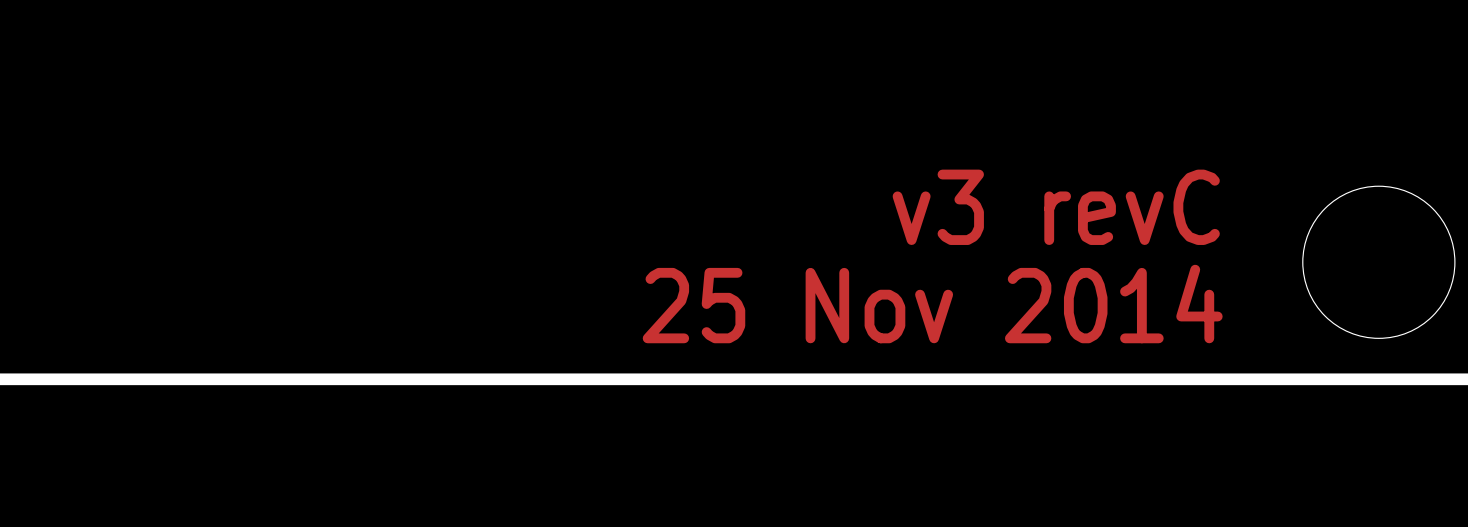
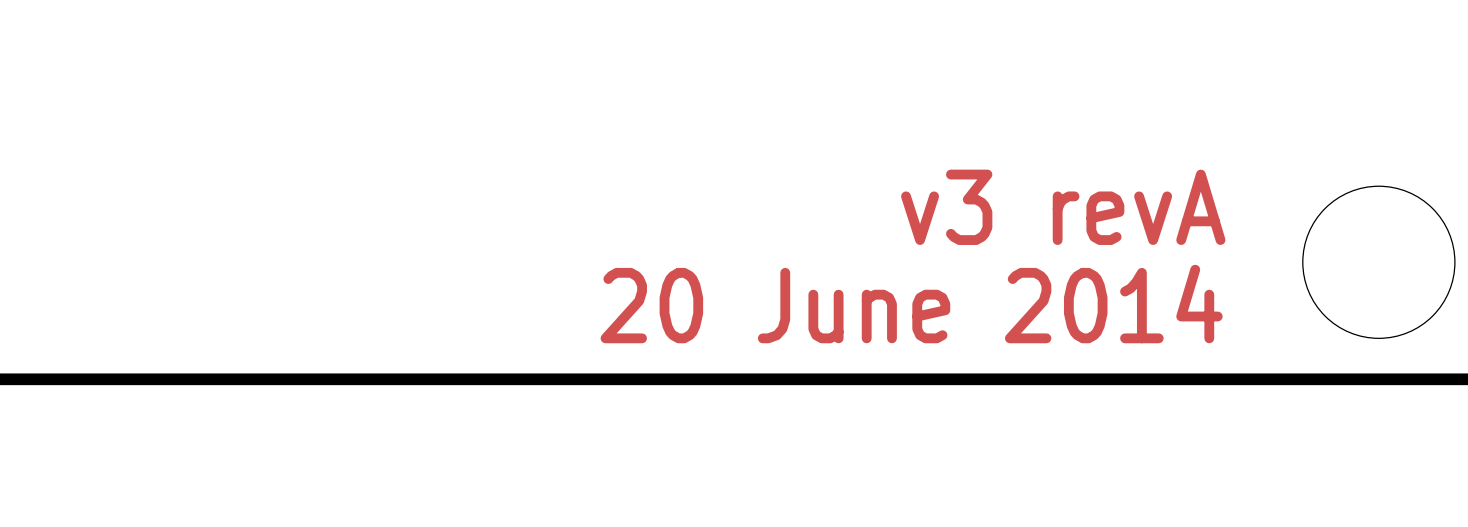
text: v3 revC (1056, 207) -> v3 revA (1063, 207)
text: 25 Nov 2014 (932, 304) -> 20 June 2014 (911, 304)

